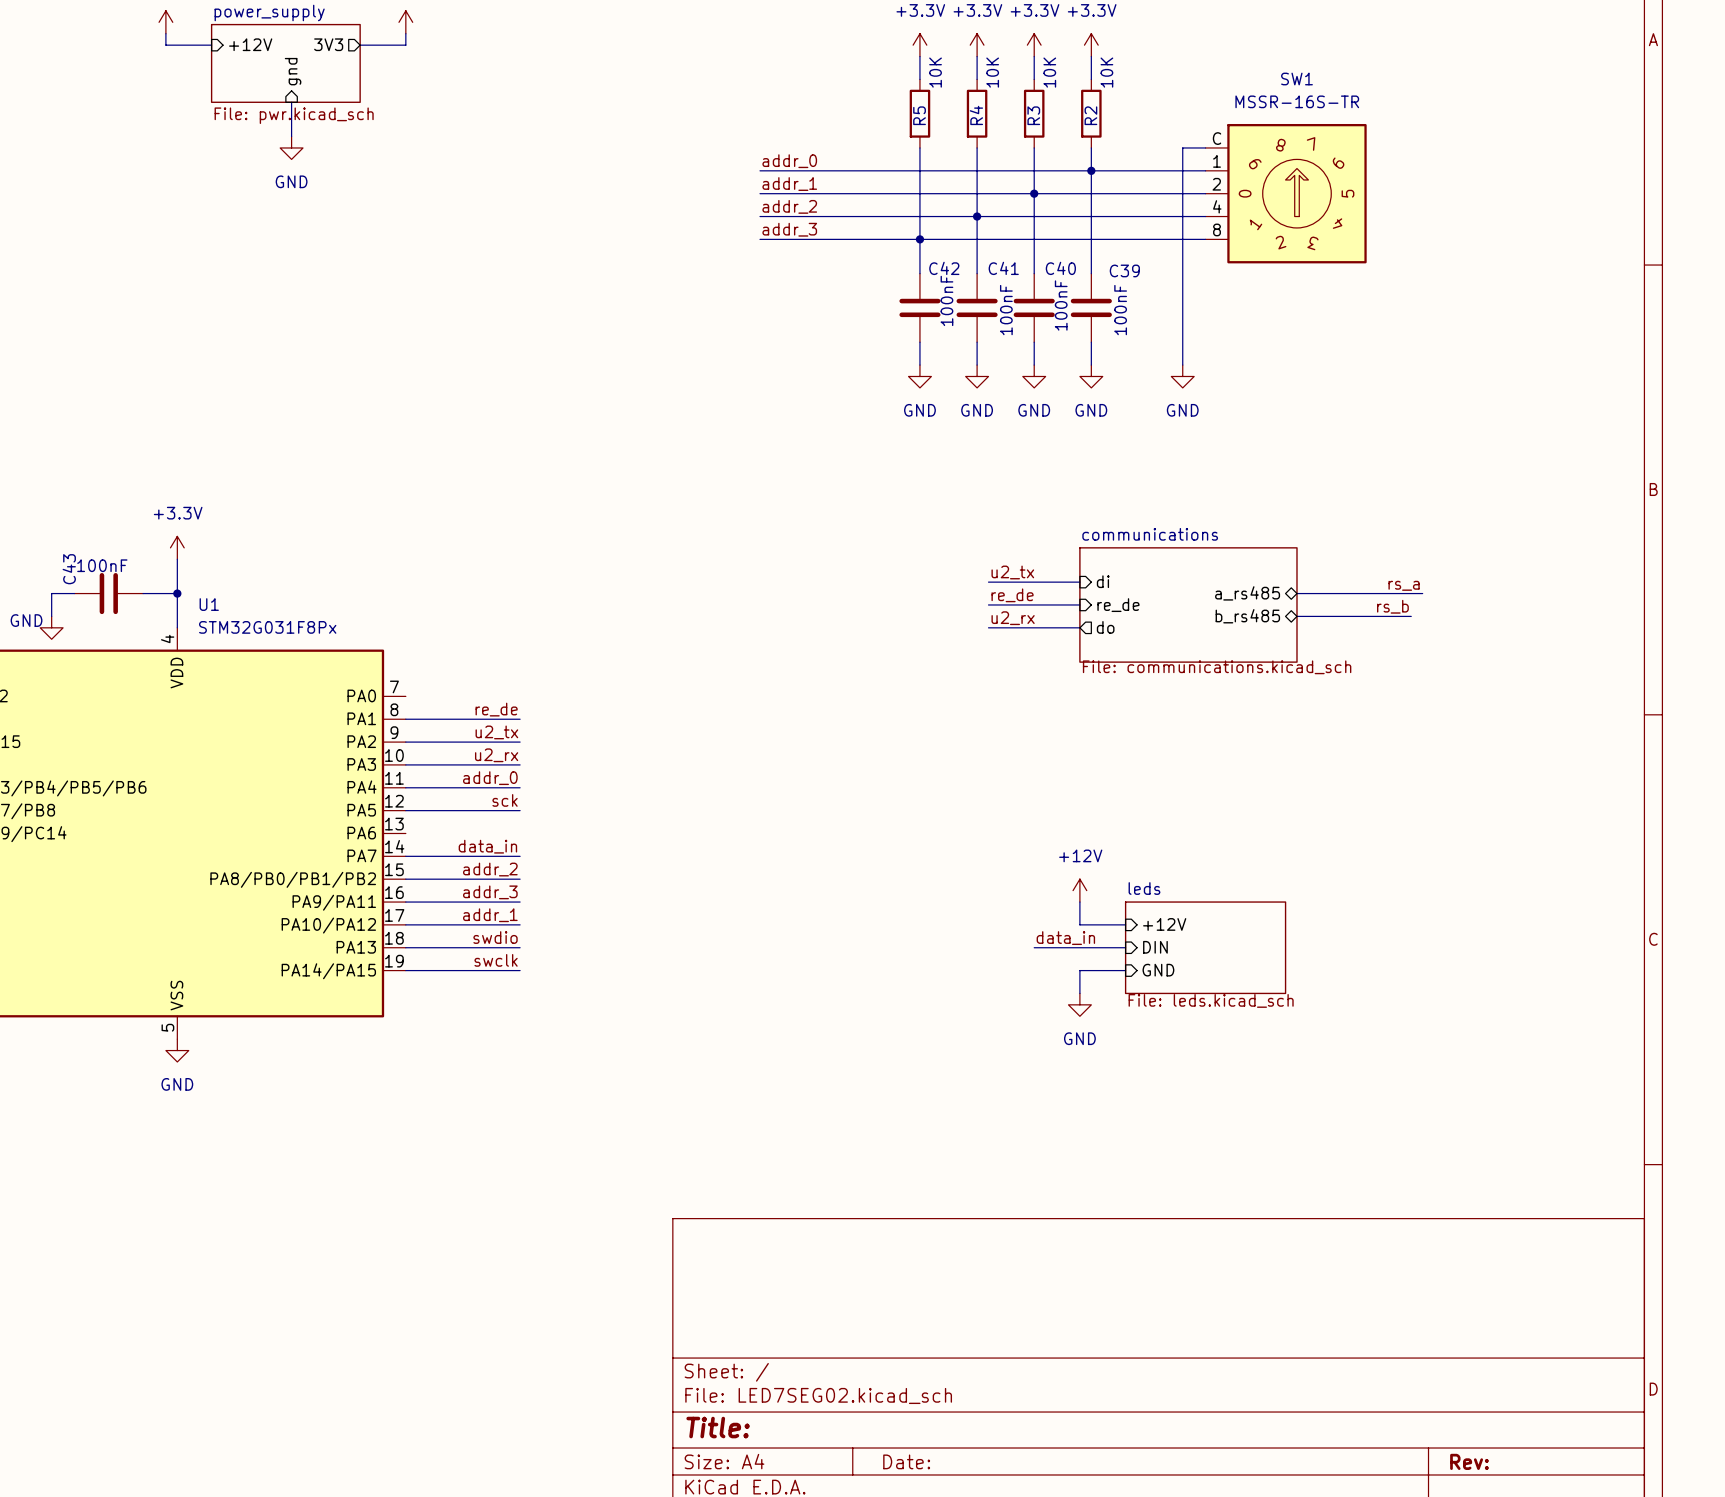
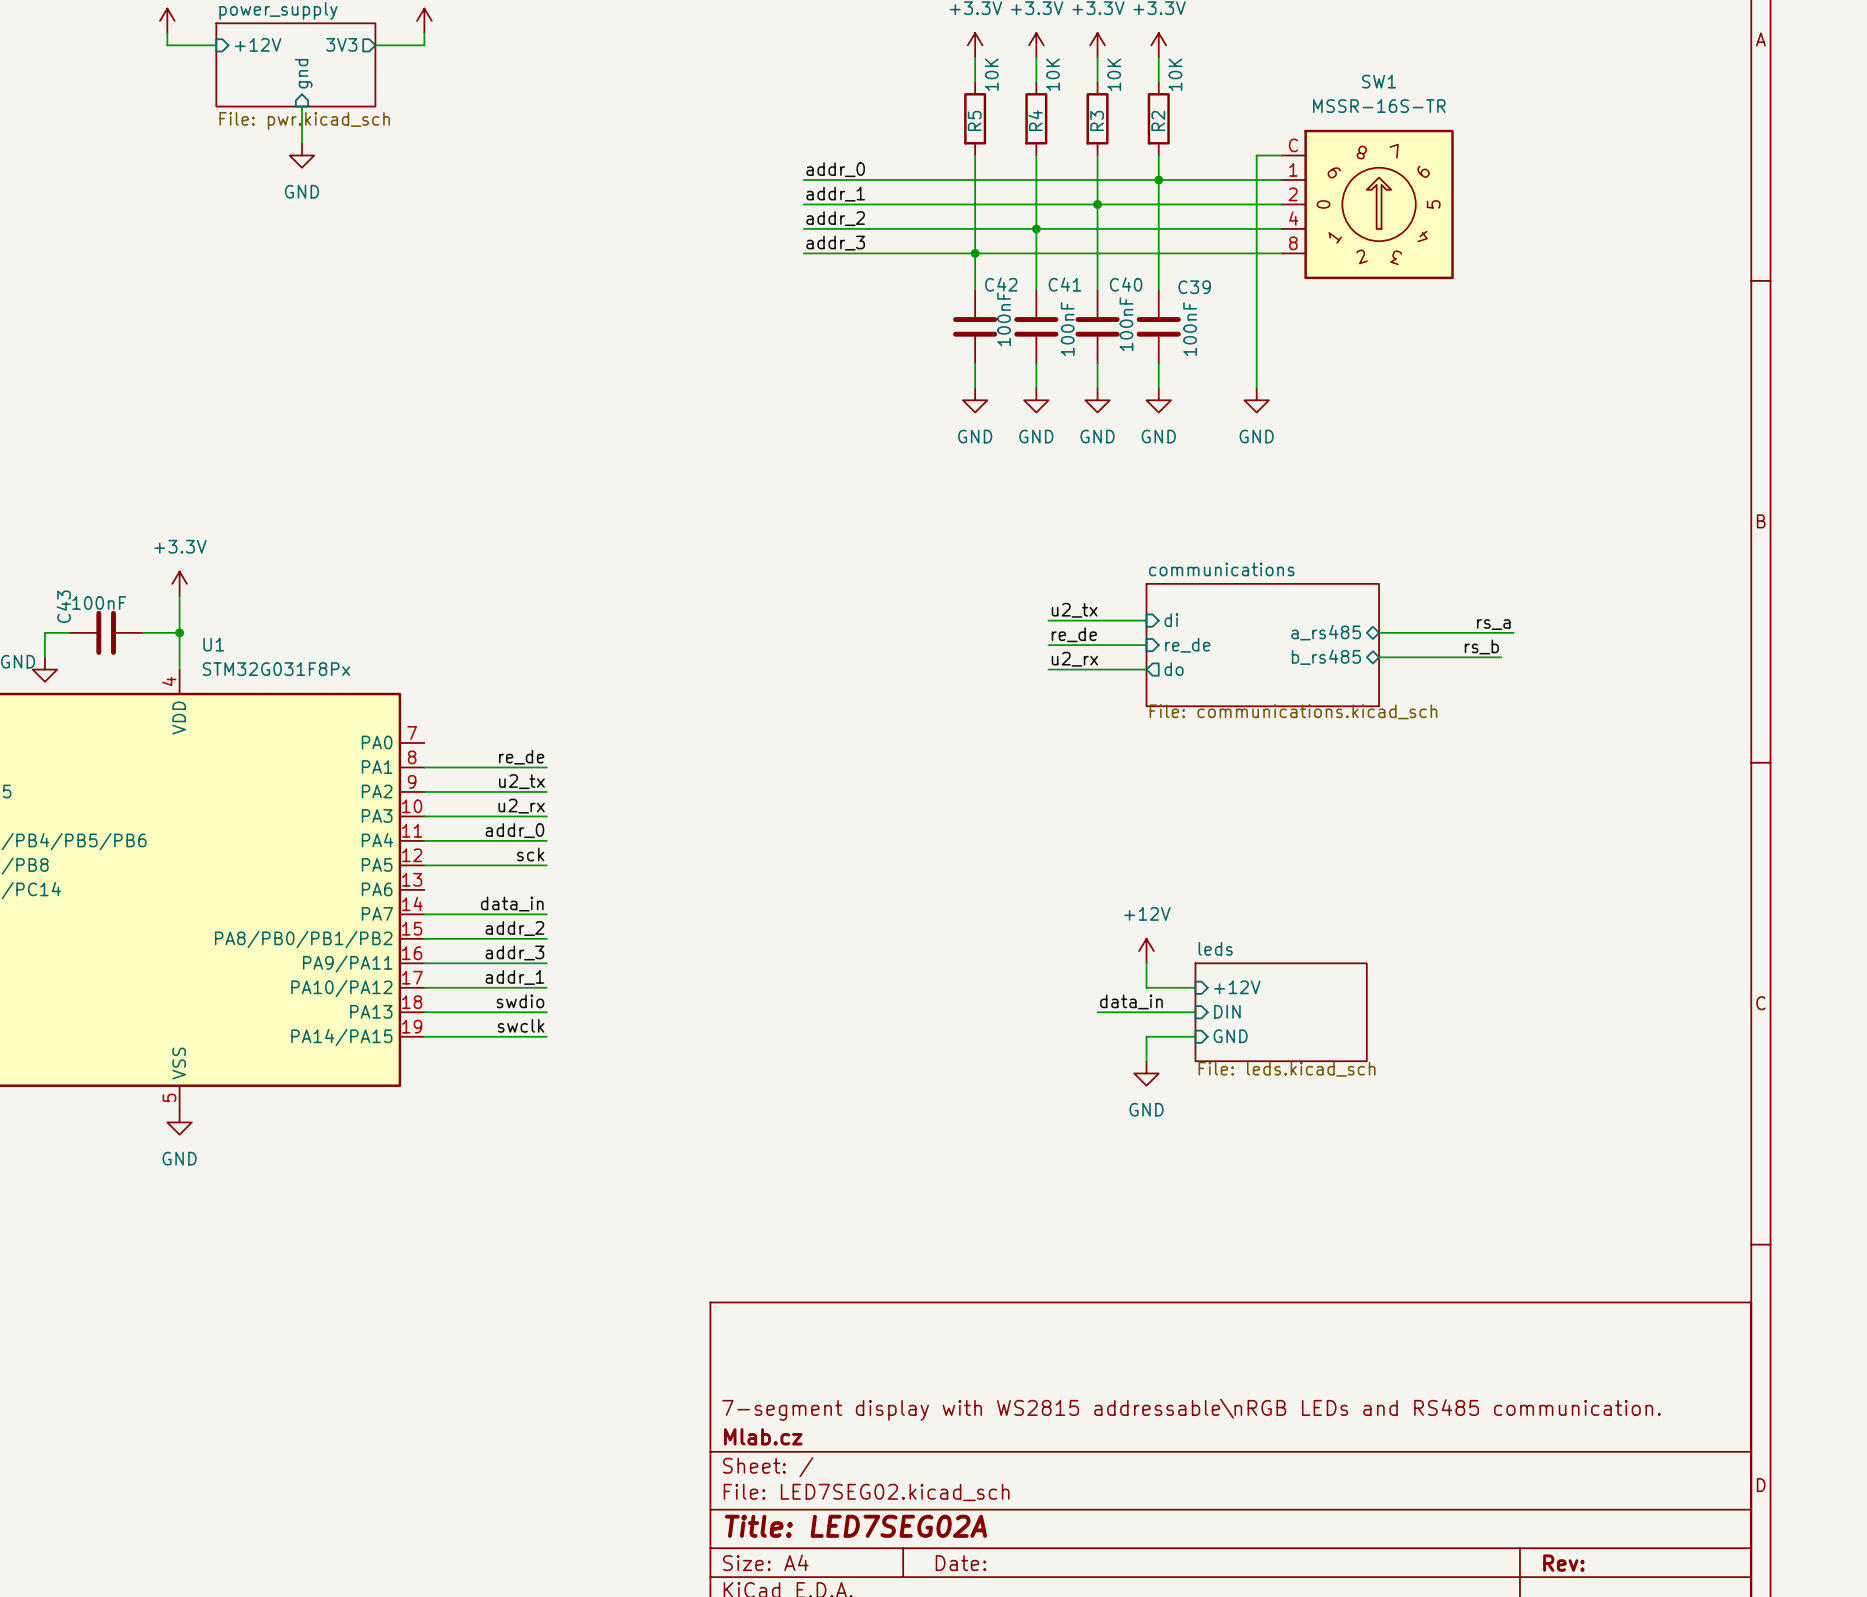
title block: none -> 7-segment display with WS2815 addressable\nRGB LEDs and RS485 communication. (1191, 1409)
title block: none -> Mlab.cz (763, 1436)
title block: Title: (718, 1427) -> Title: LED7SEG02A (855, 1526)

